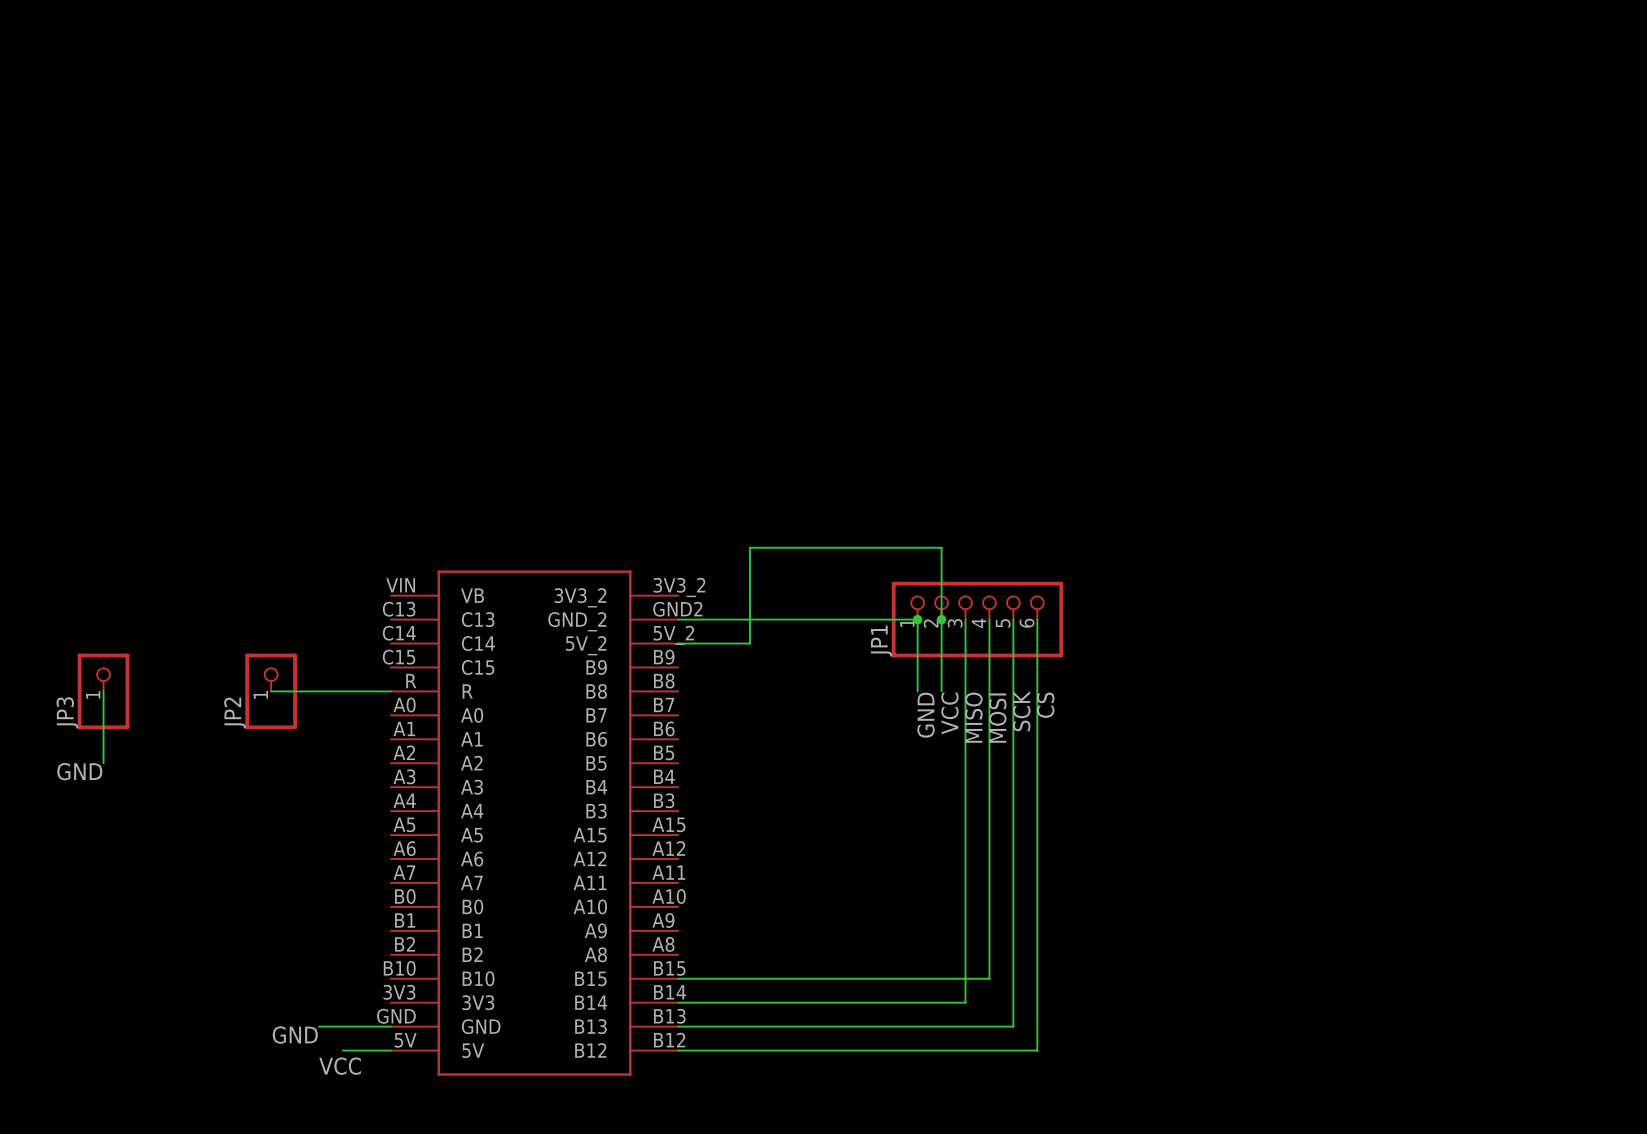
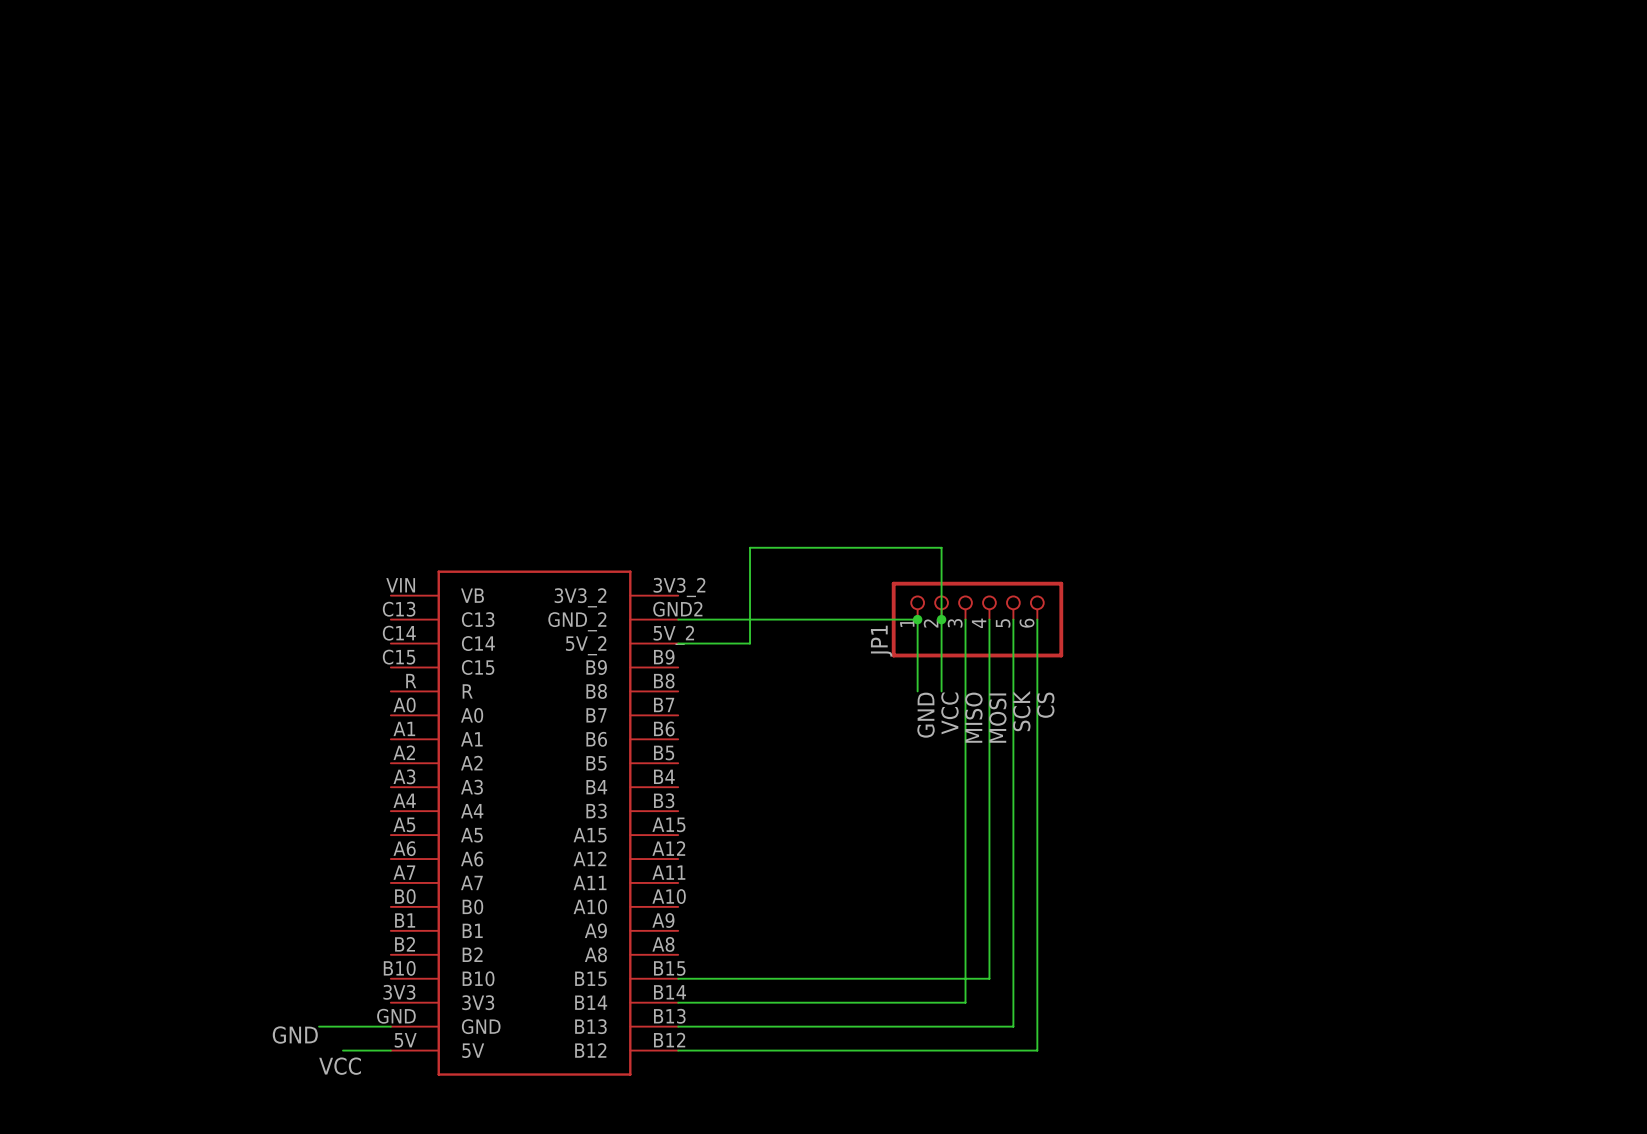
wire: (103, 691) (103, 763) -> none
JP3: (103, 691) -> none
wire: (271, 691) (390, 691) -> none
JP2: (271, 691) -> none
label: GND (79, 771) -> none

